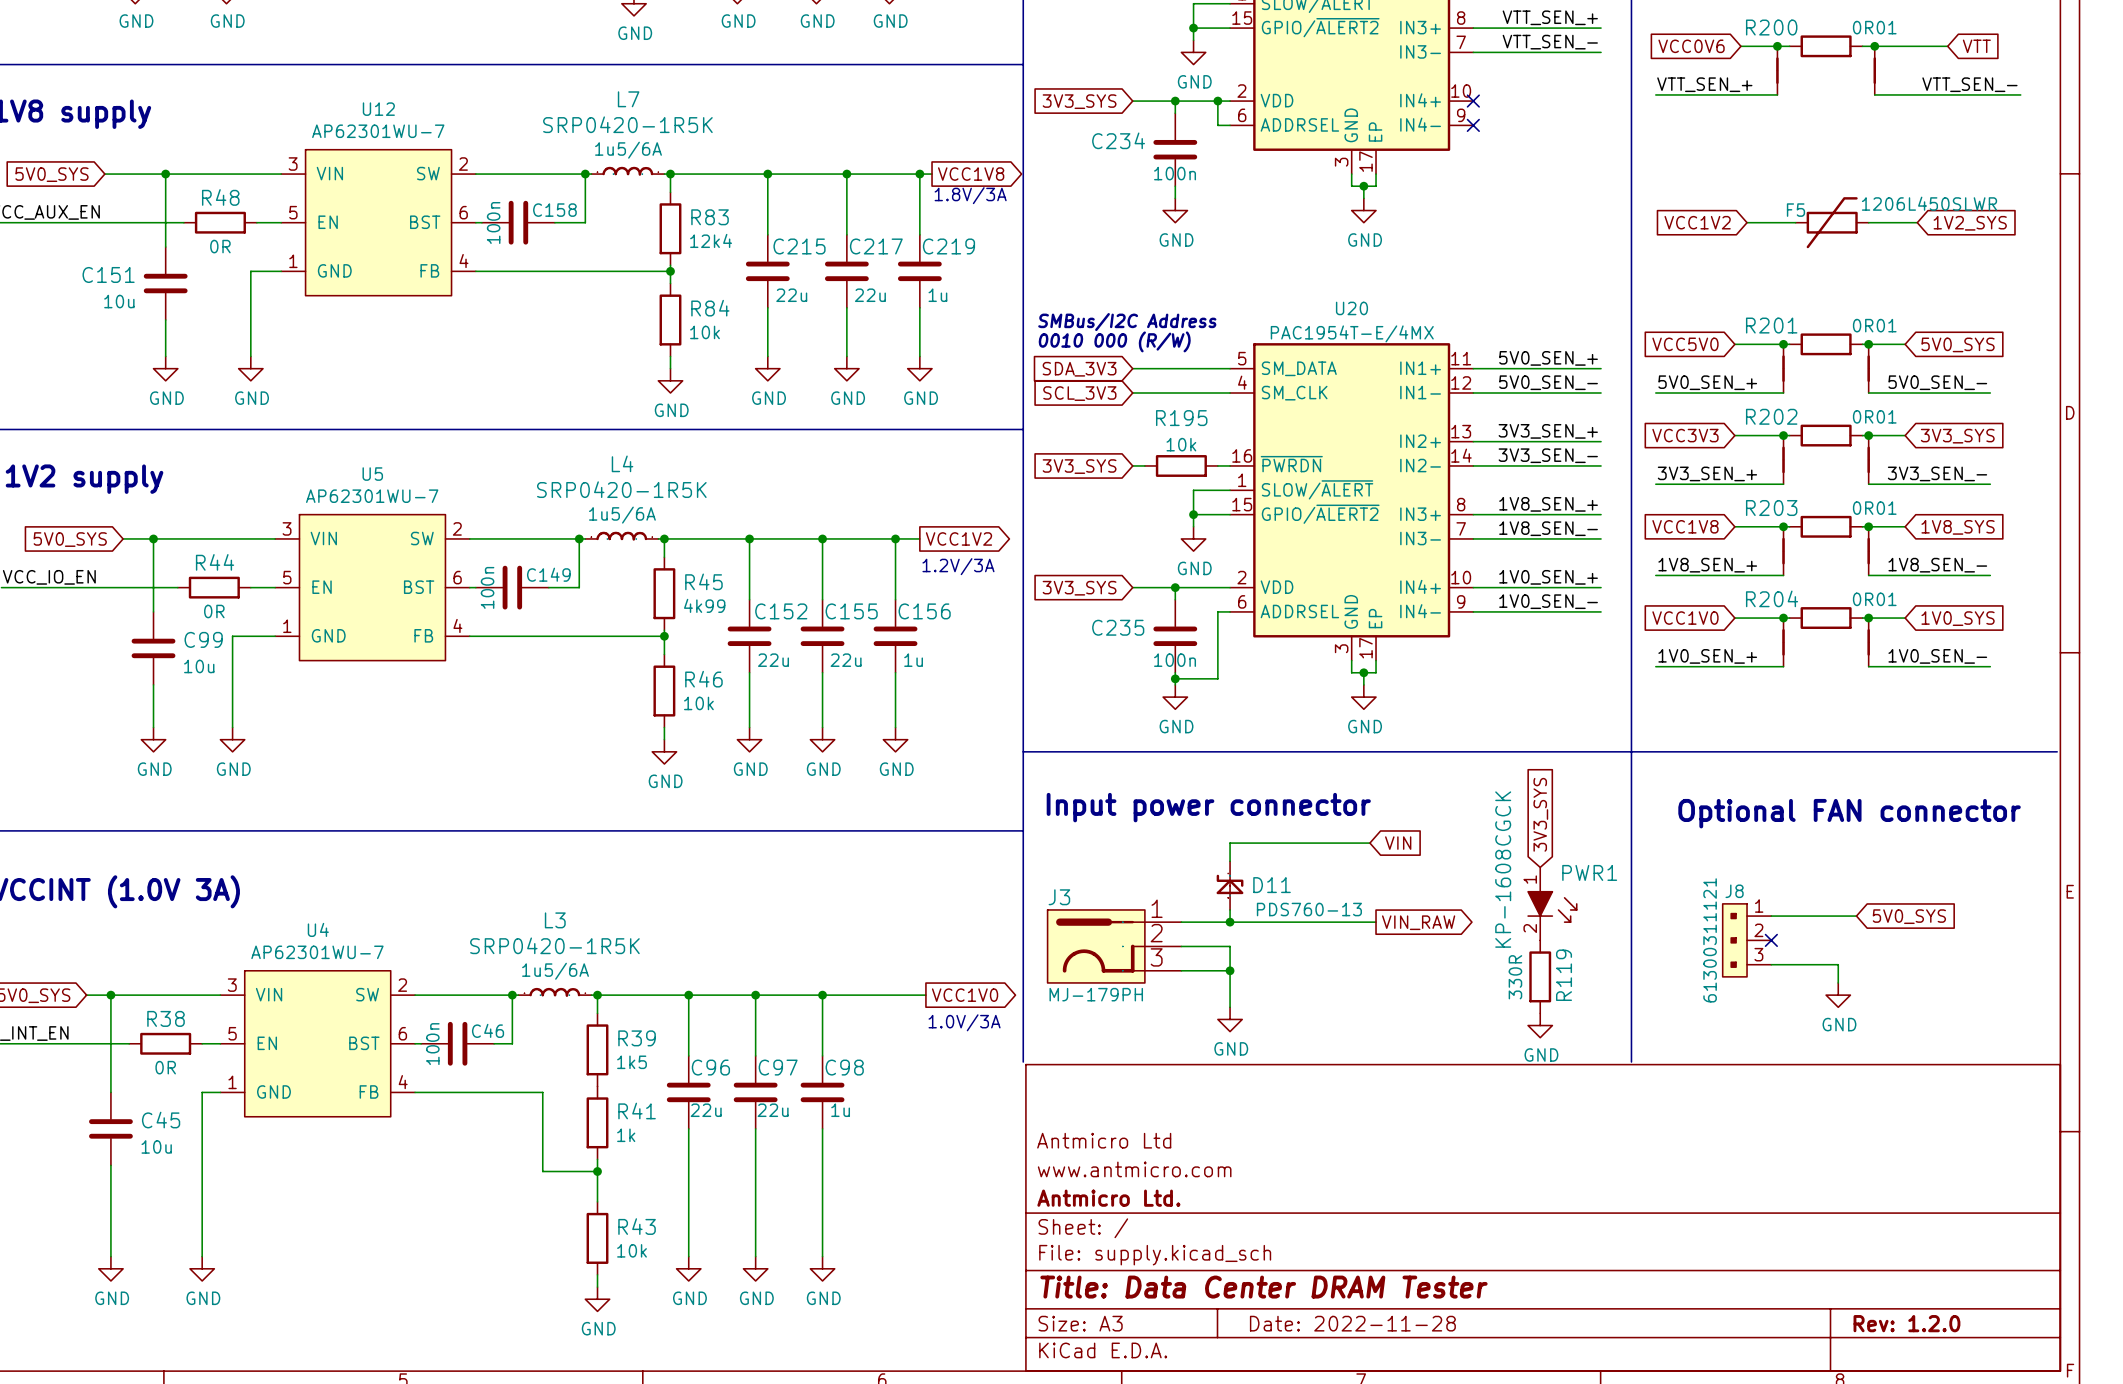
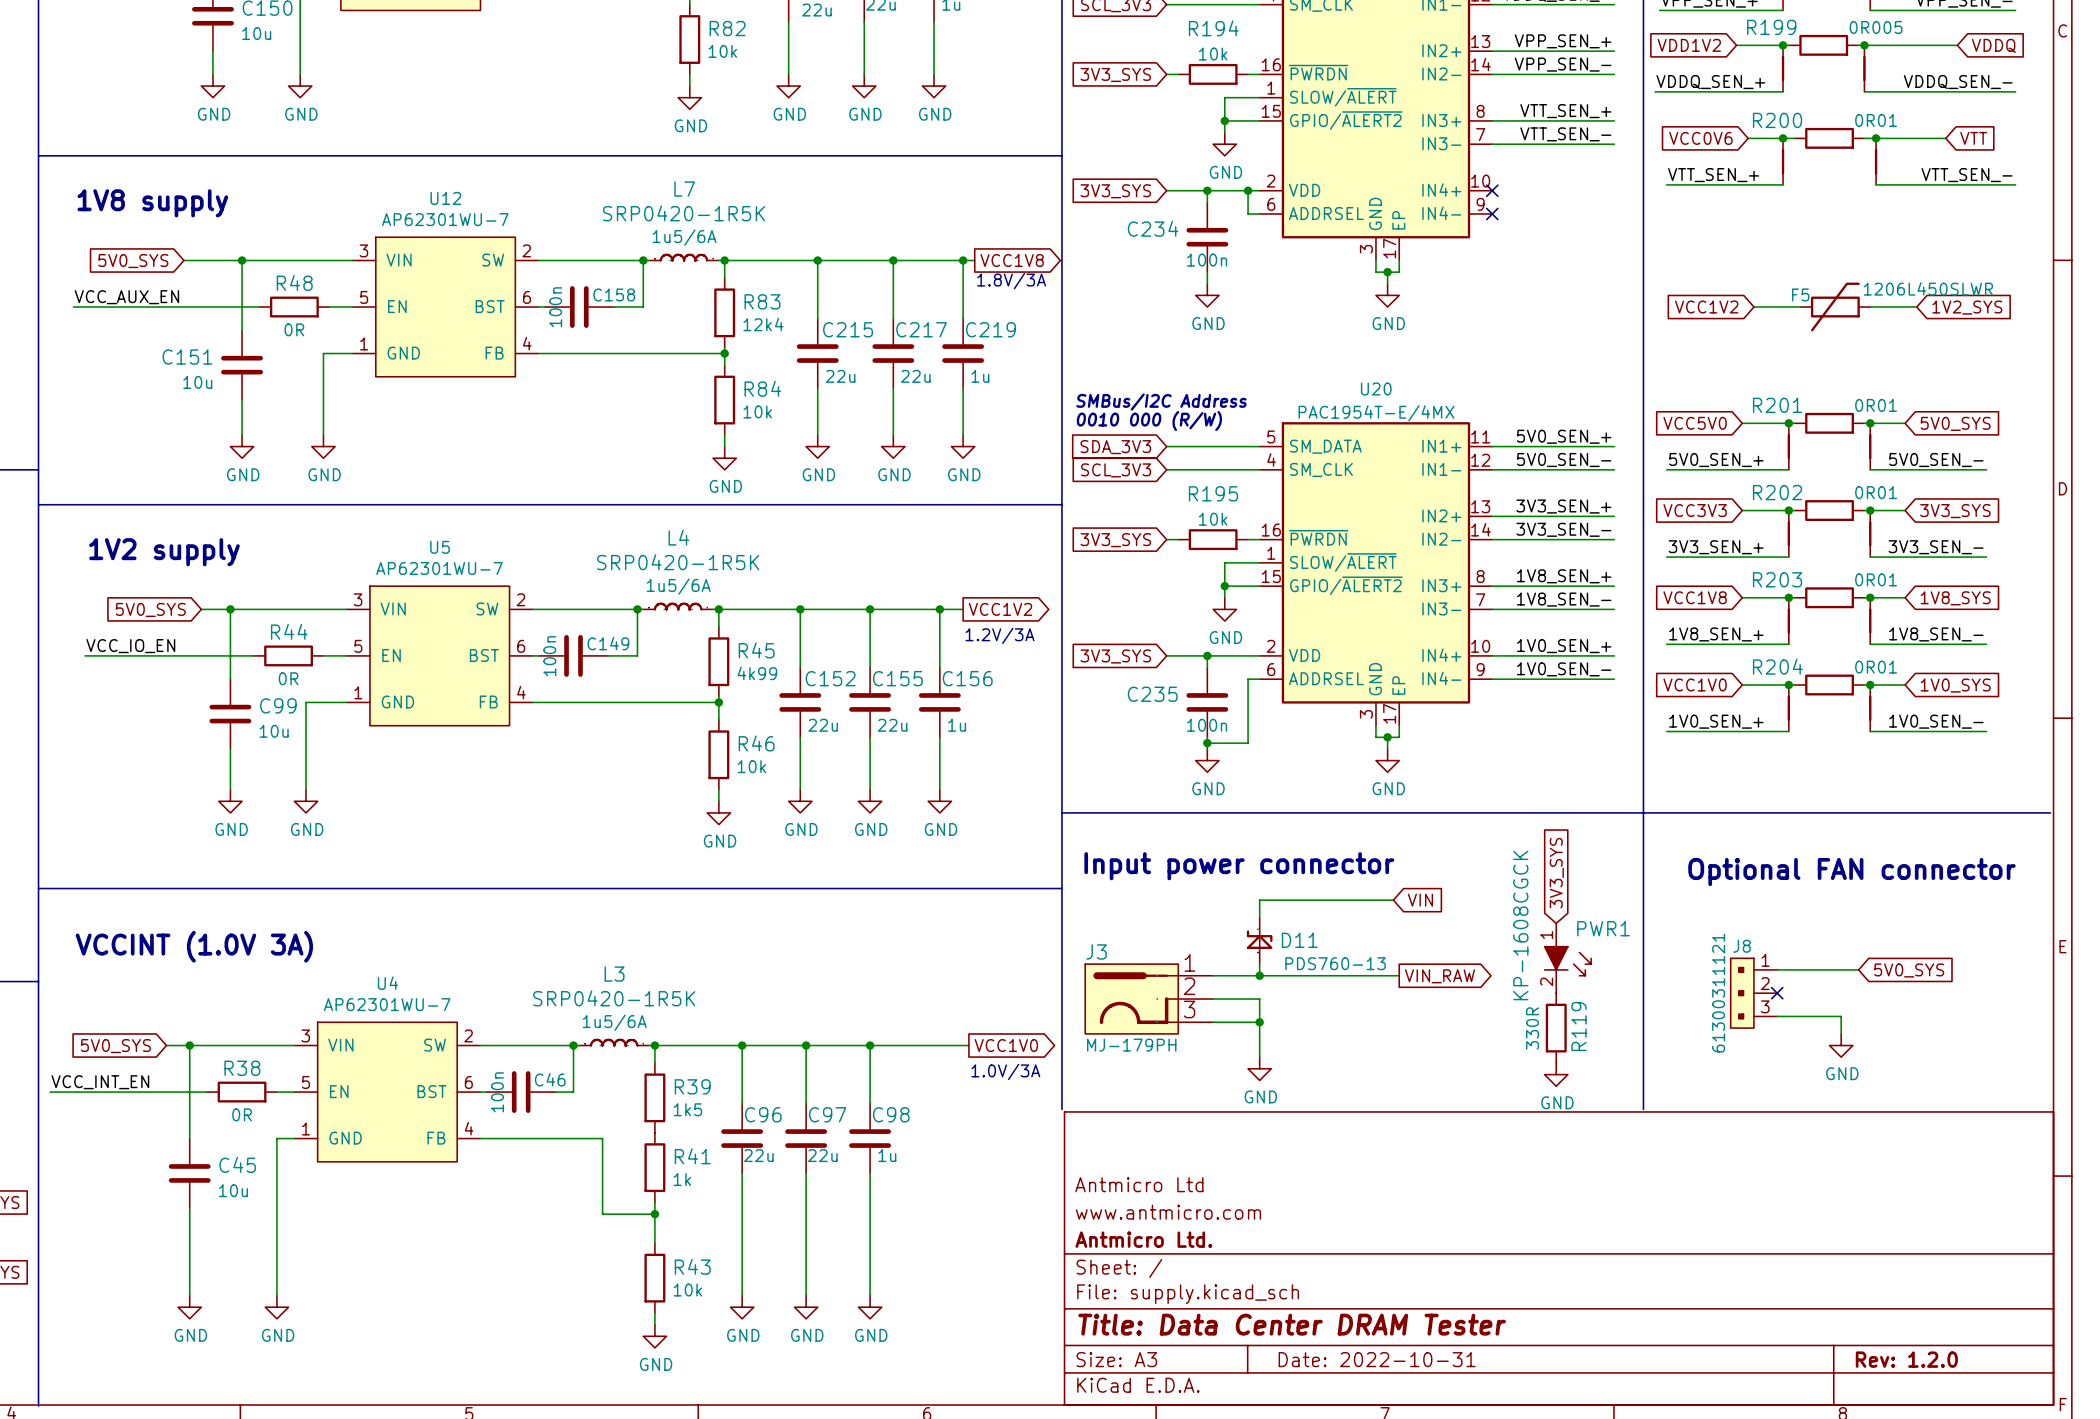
title block: Date: 2022-11-28 (1352, 1323) -> Date: 2022-10-31 (1377, 1359)

